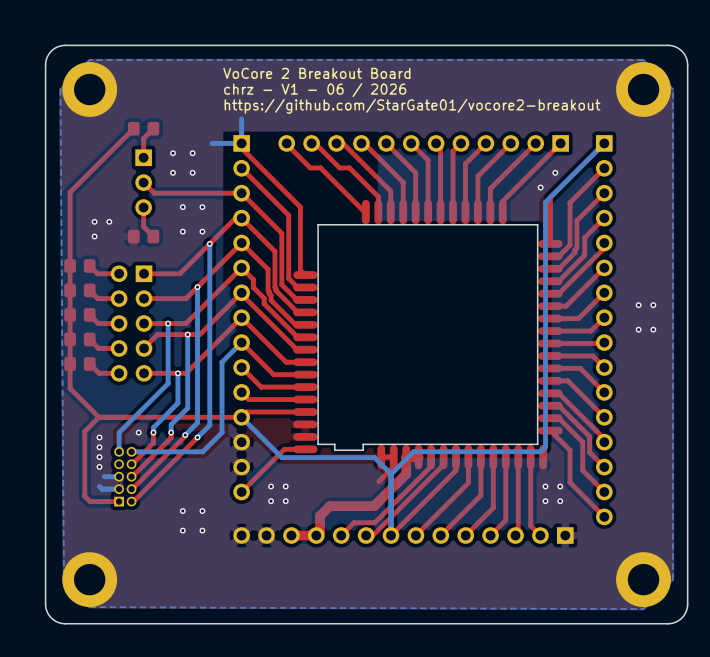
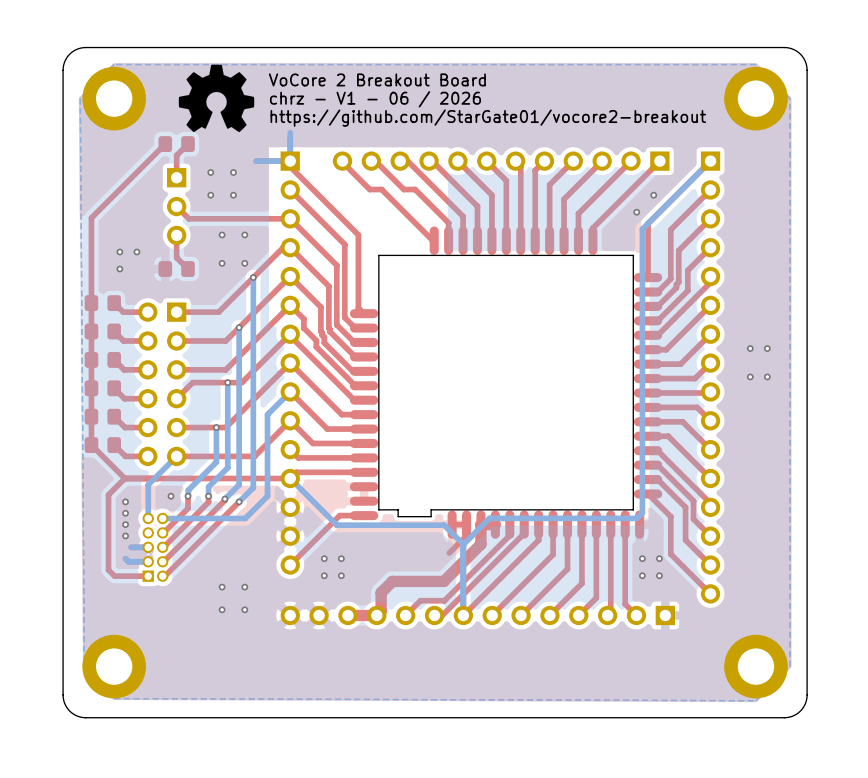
drawing: none -> [178, 64, 255, 133]
part: (131, 323) -> none
bottom track: (168, 323) (168, 383) (119, 432) -> (176, 456) (148, 484) (148, 496)
via: (168, 323) -> none
part: none -> (162, 384)
top track: none -> (290, 420) (254, 456) (176, 456)
part: none -> (102, 445)
top track: none -> (114, 445) (125, 456) (147, 456)

